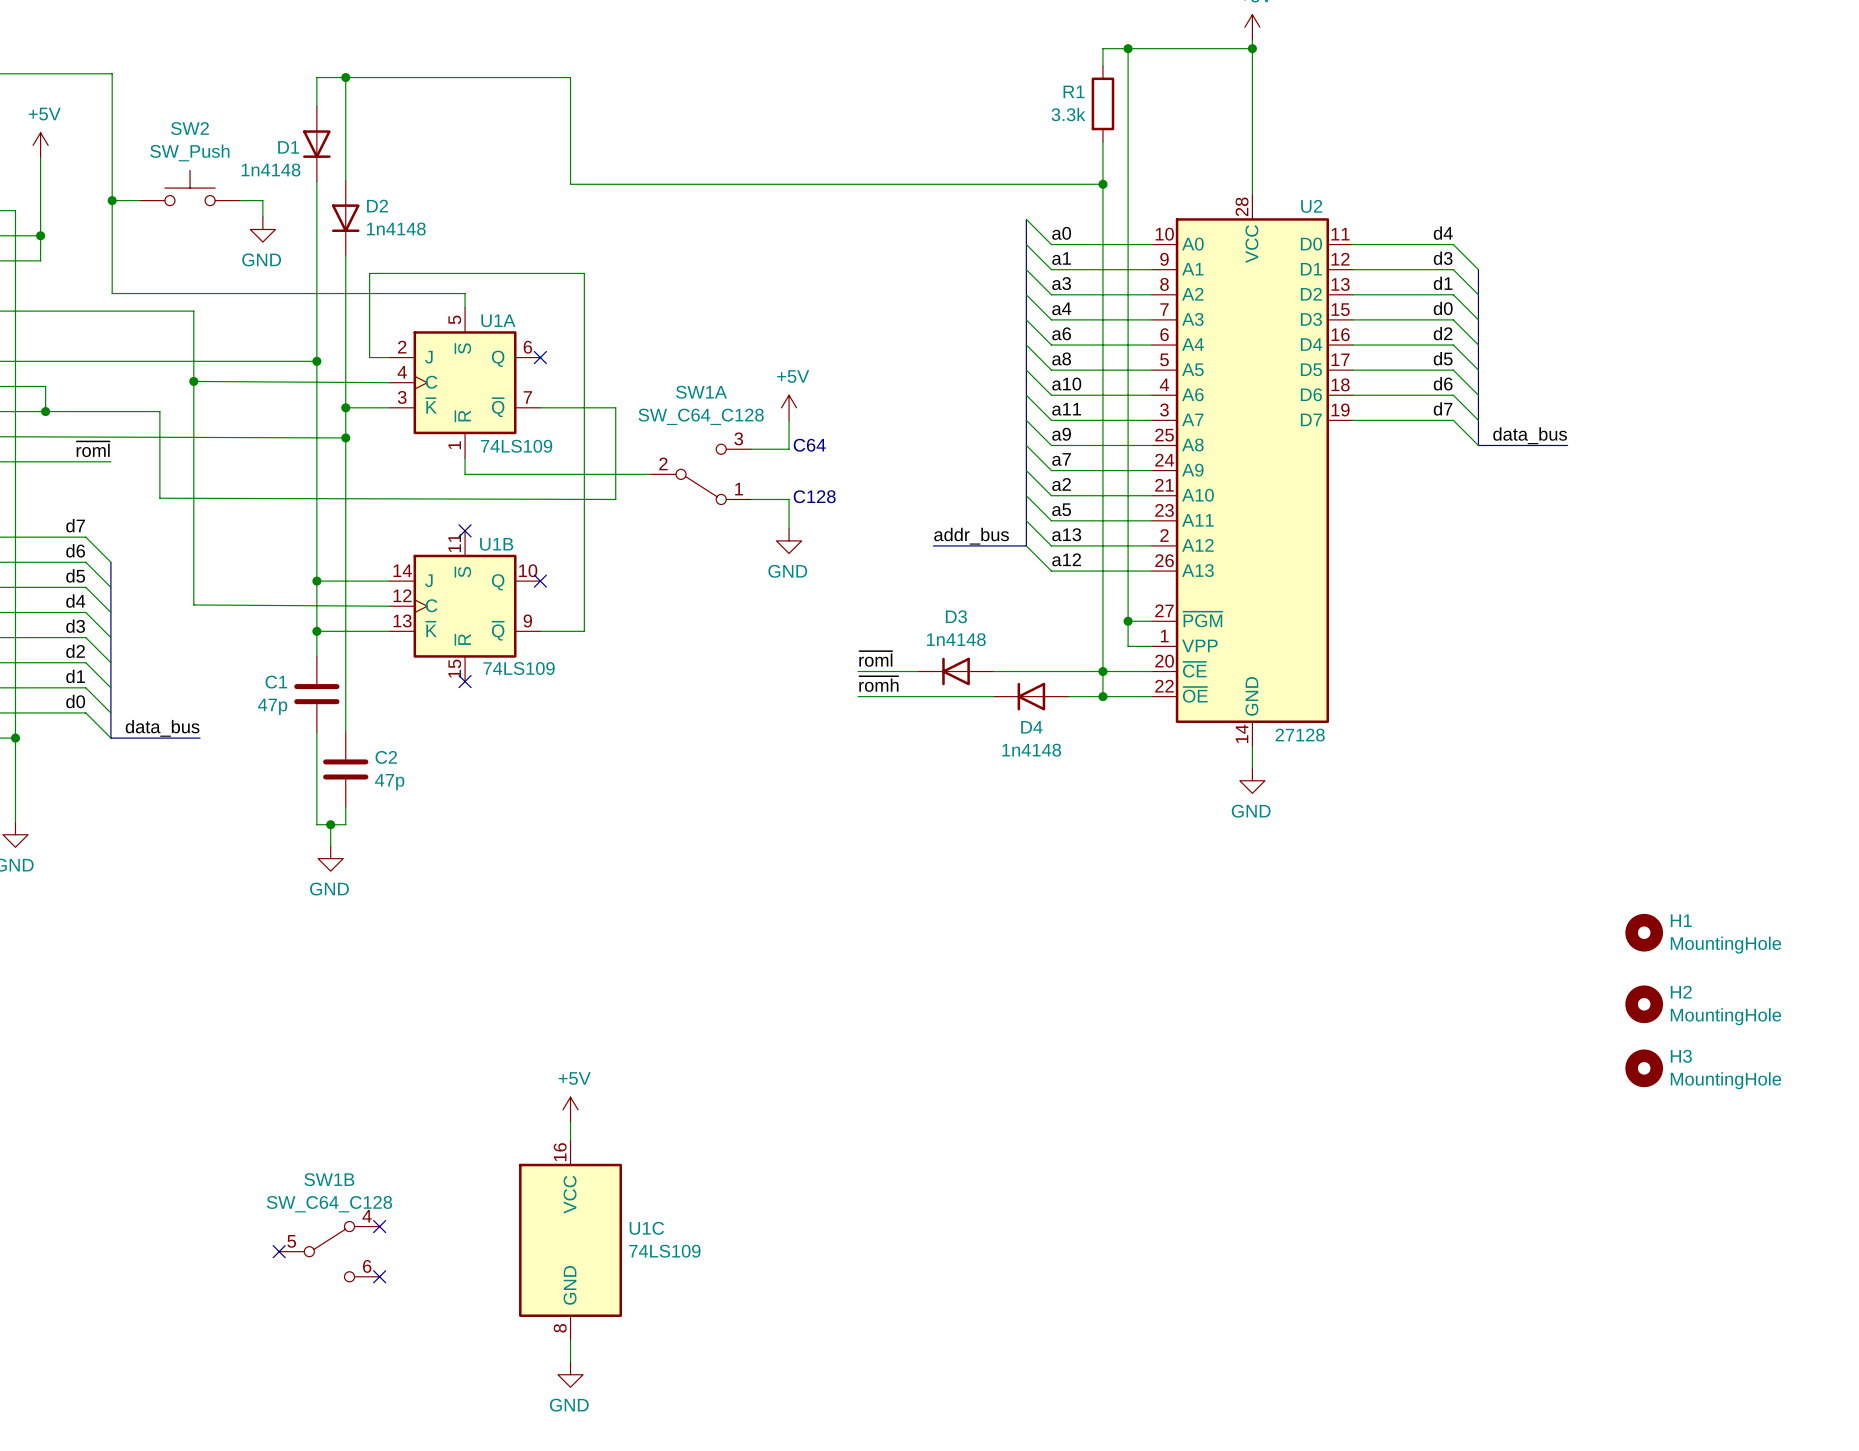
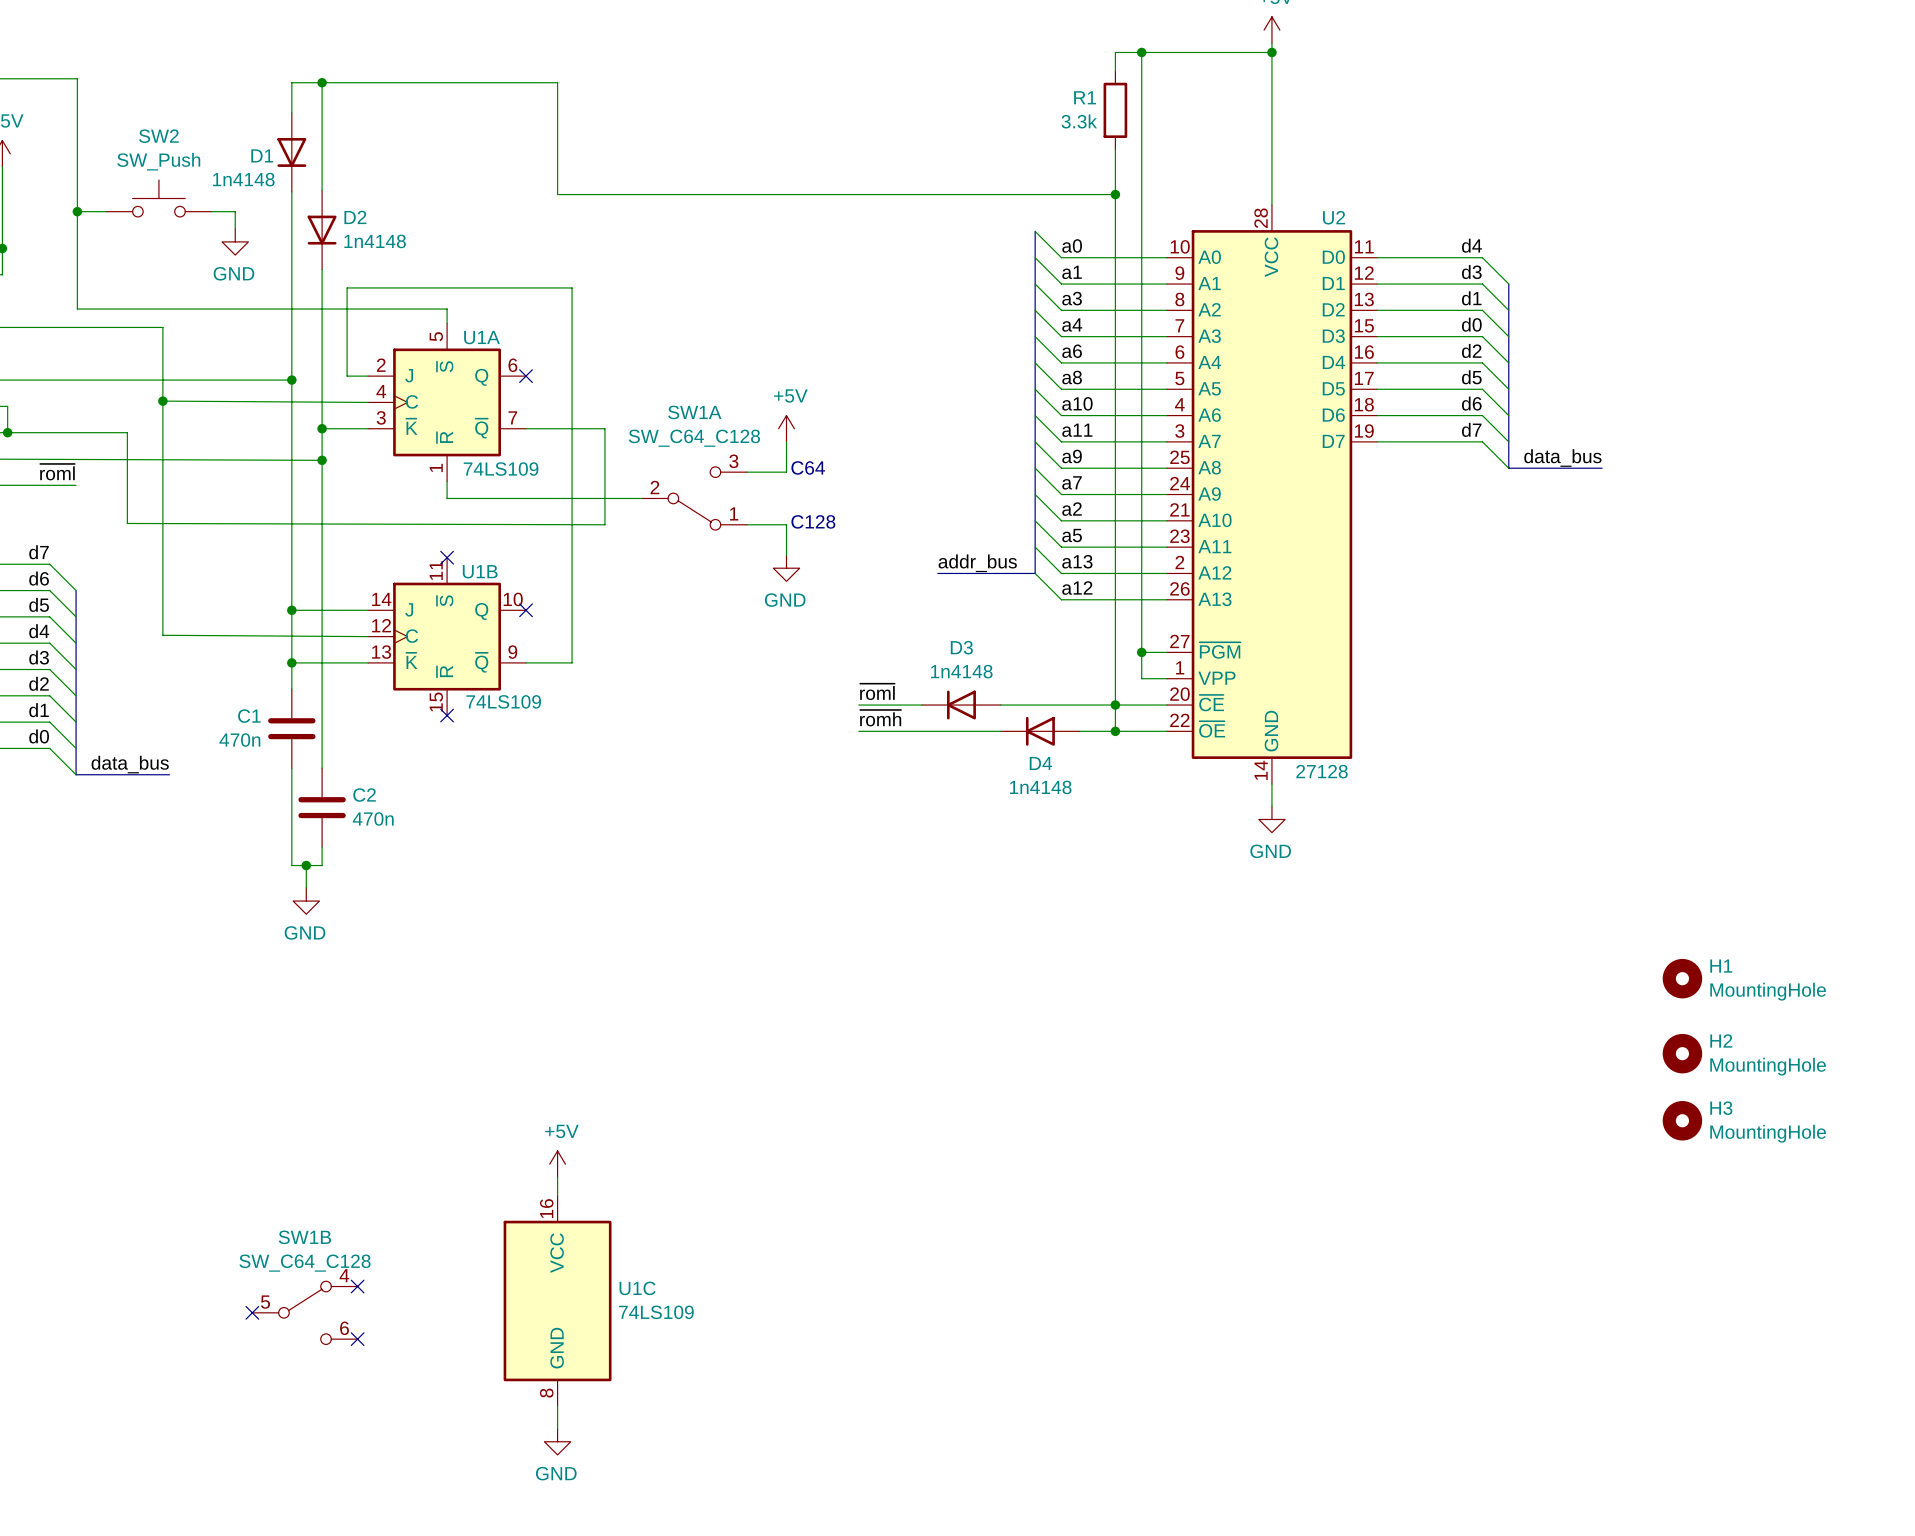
C1 value: 47p (272, 706) -> 470n (239, 740)
C2 value: 47p (389, 782) -> 470n (373, 818)

